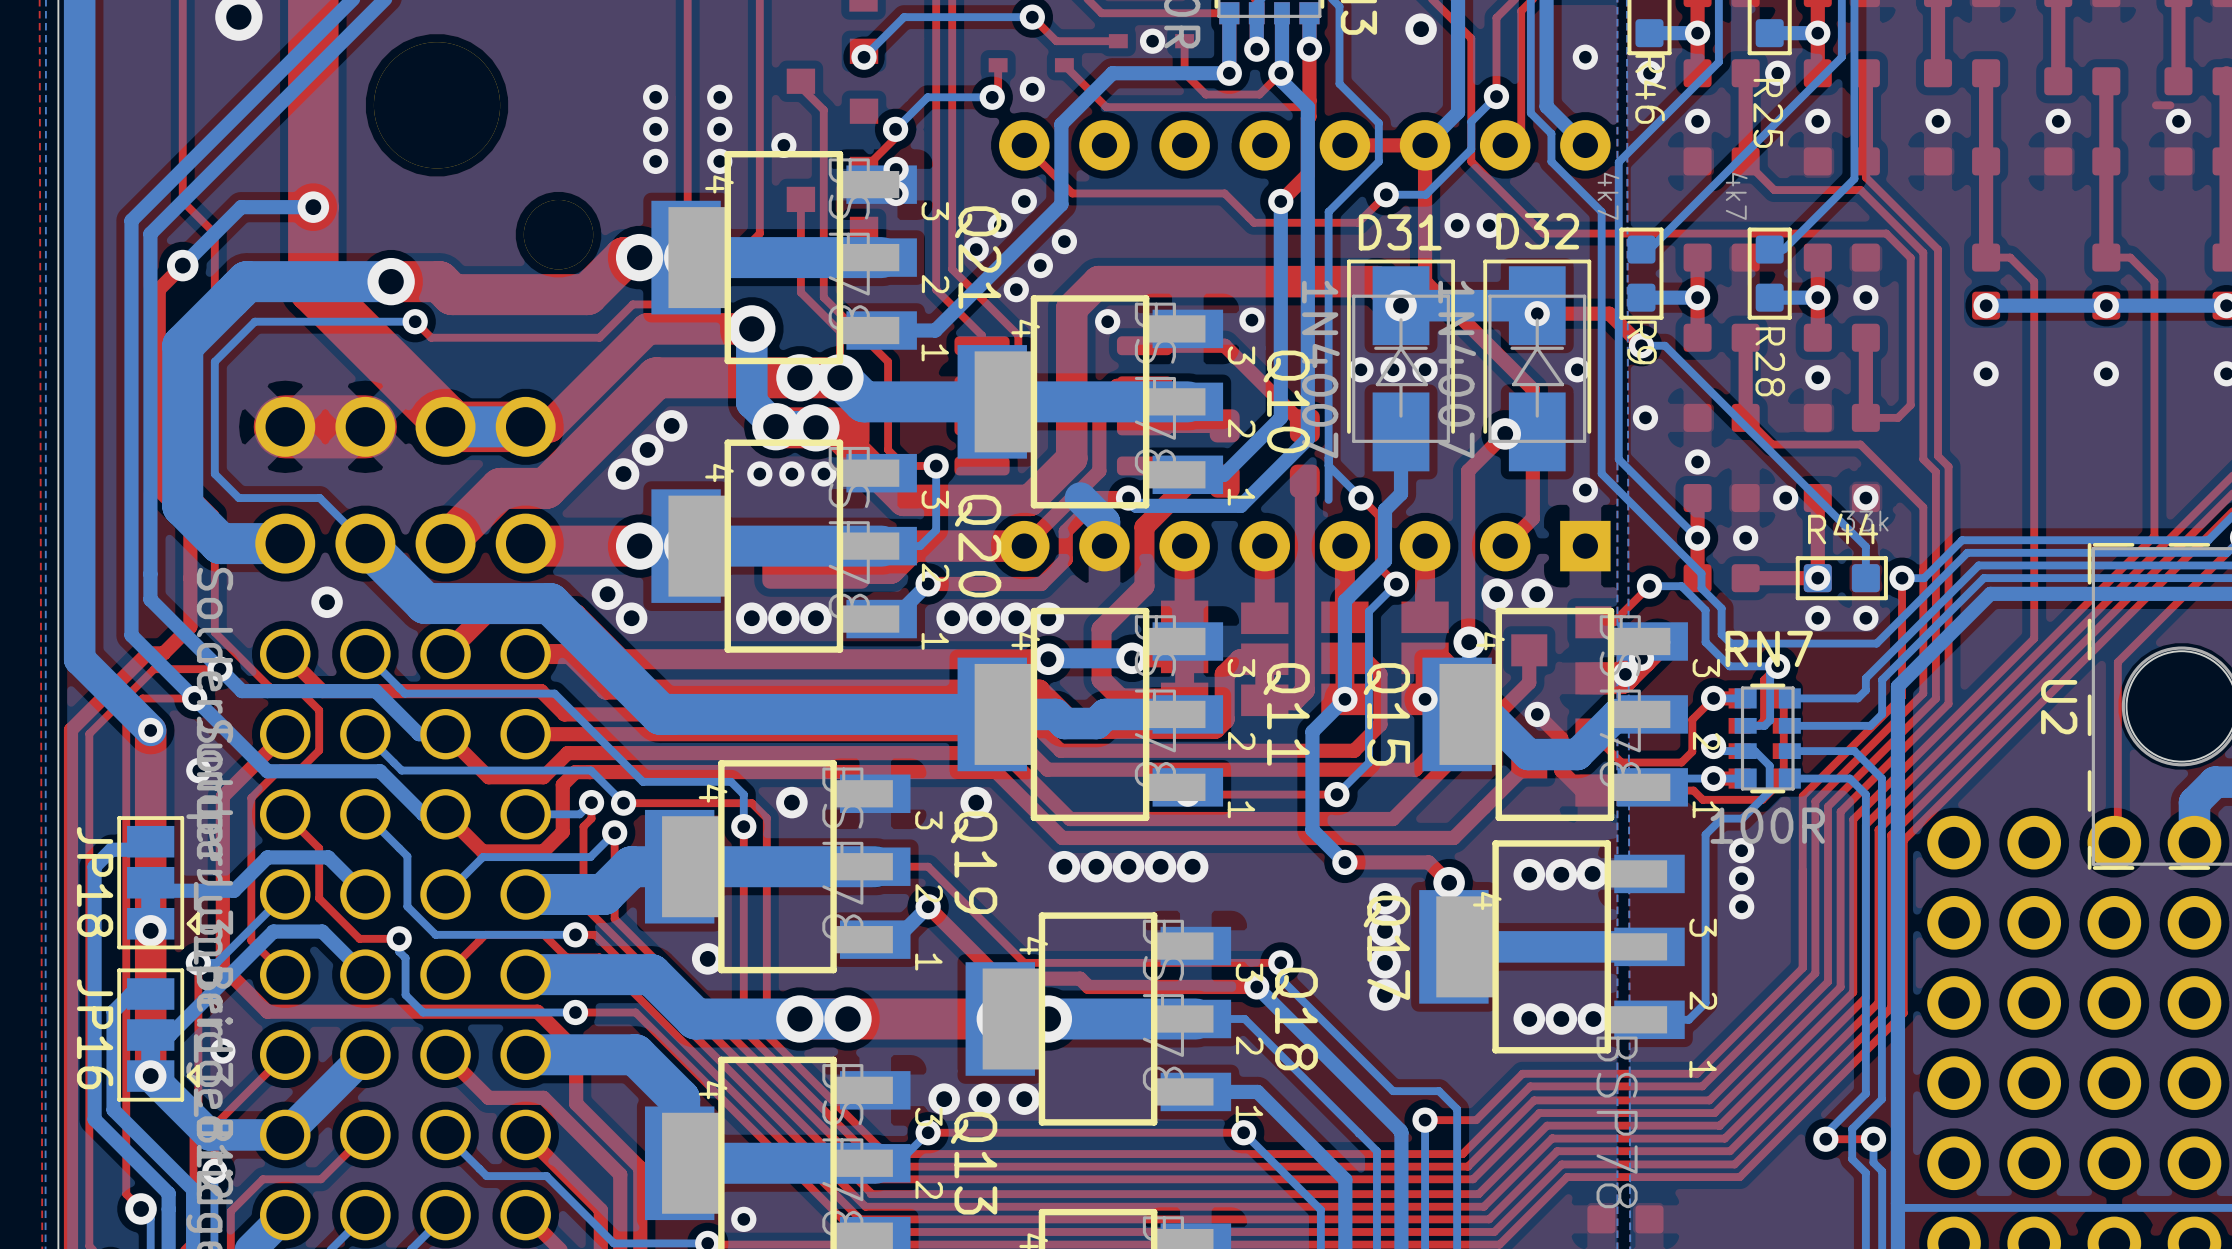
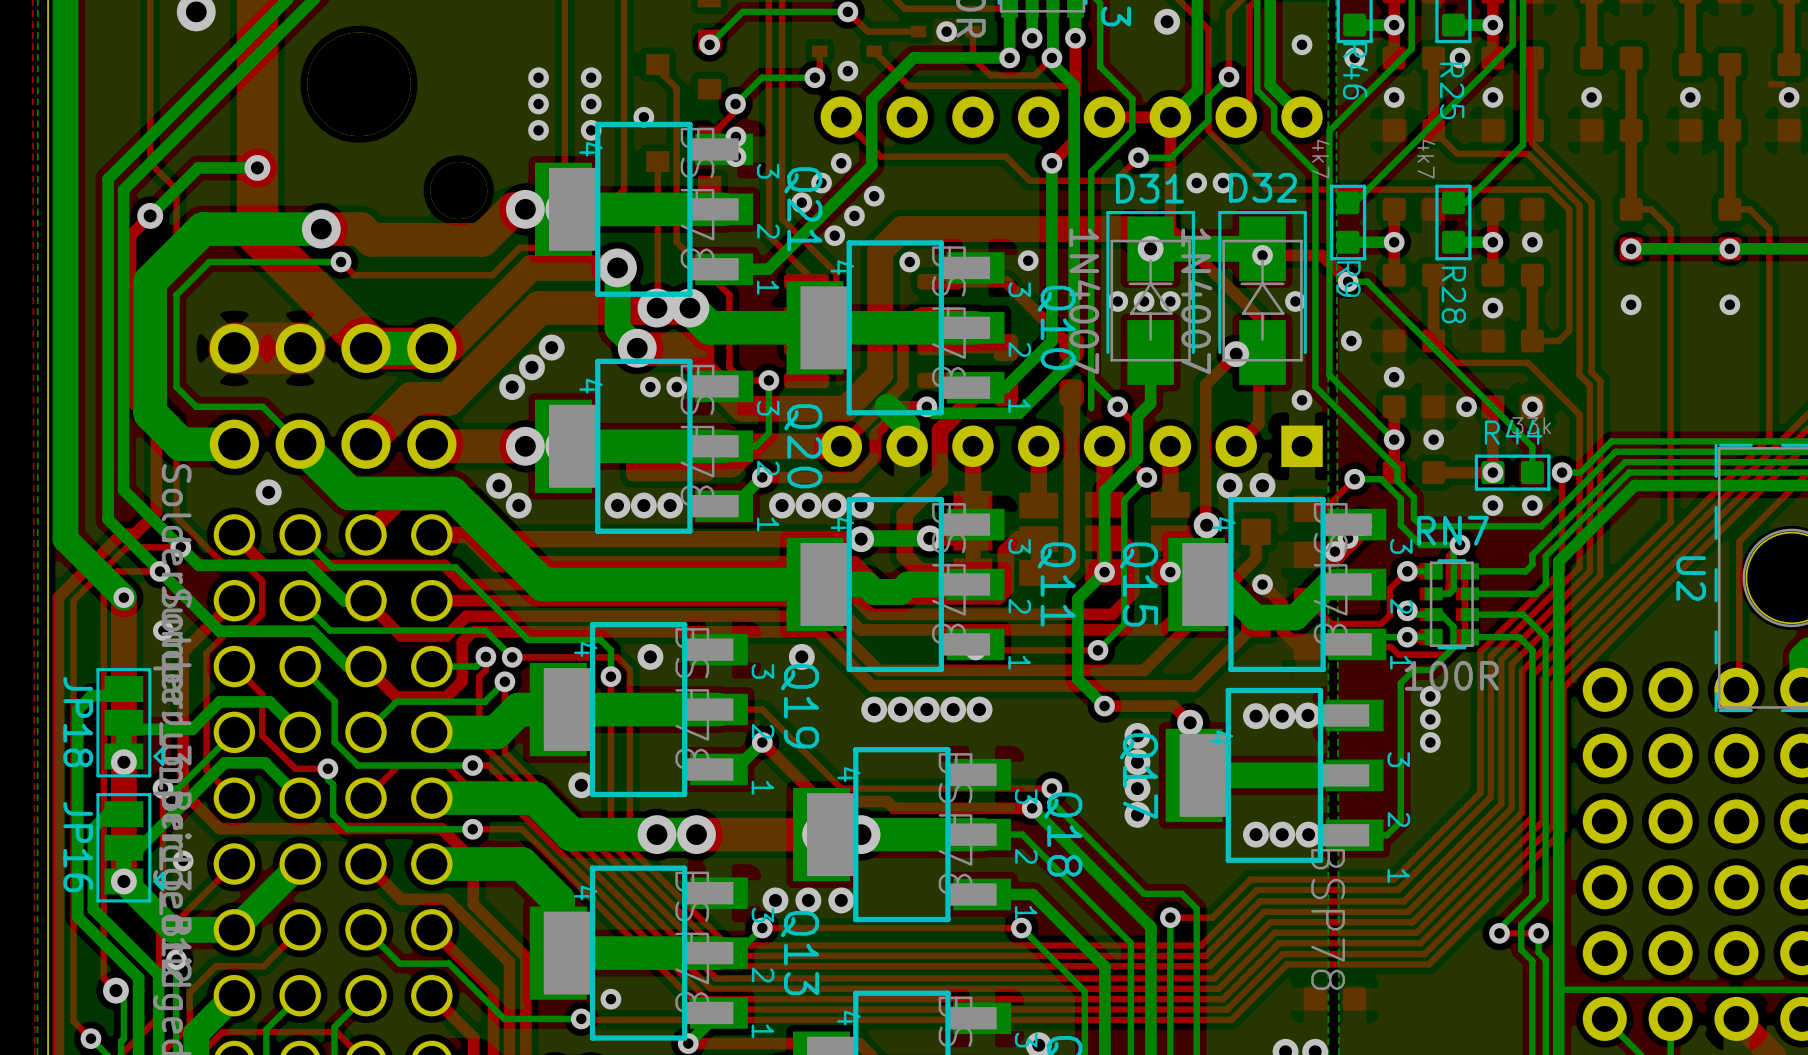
top track: (800, 292) (839, 331) (839, 377) -> (657, 237) (657, 307)
via: (815, 427) -> none
via: (759, 473) -> none

